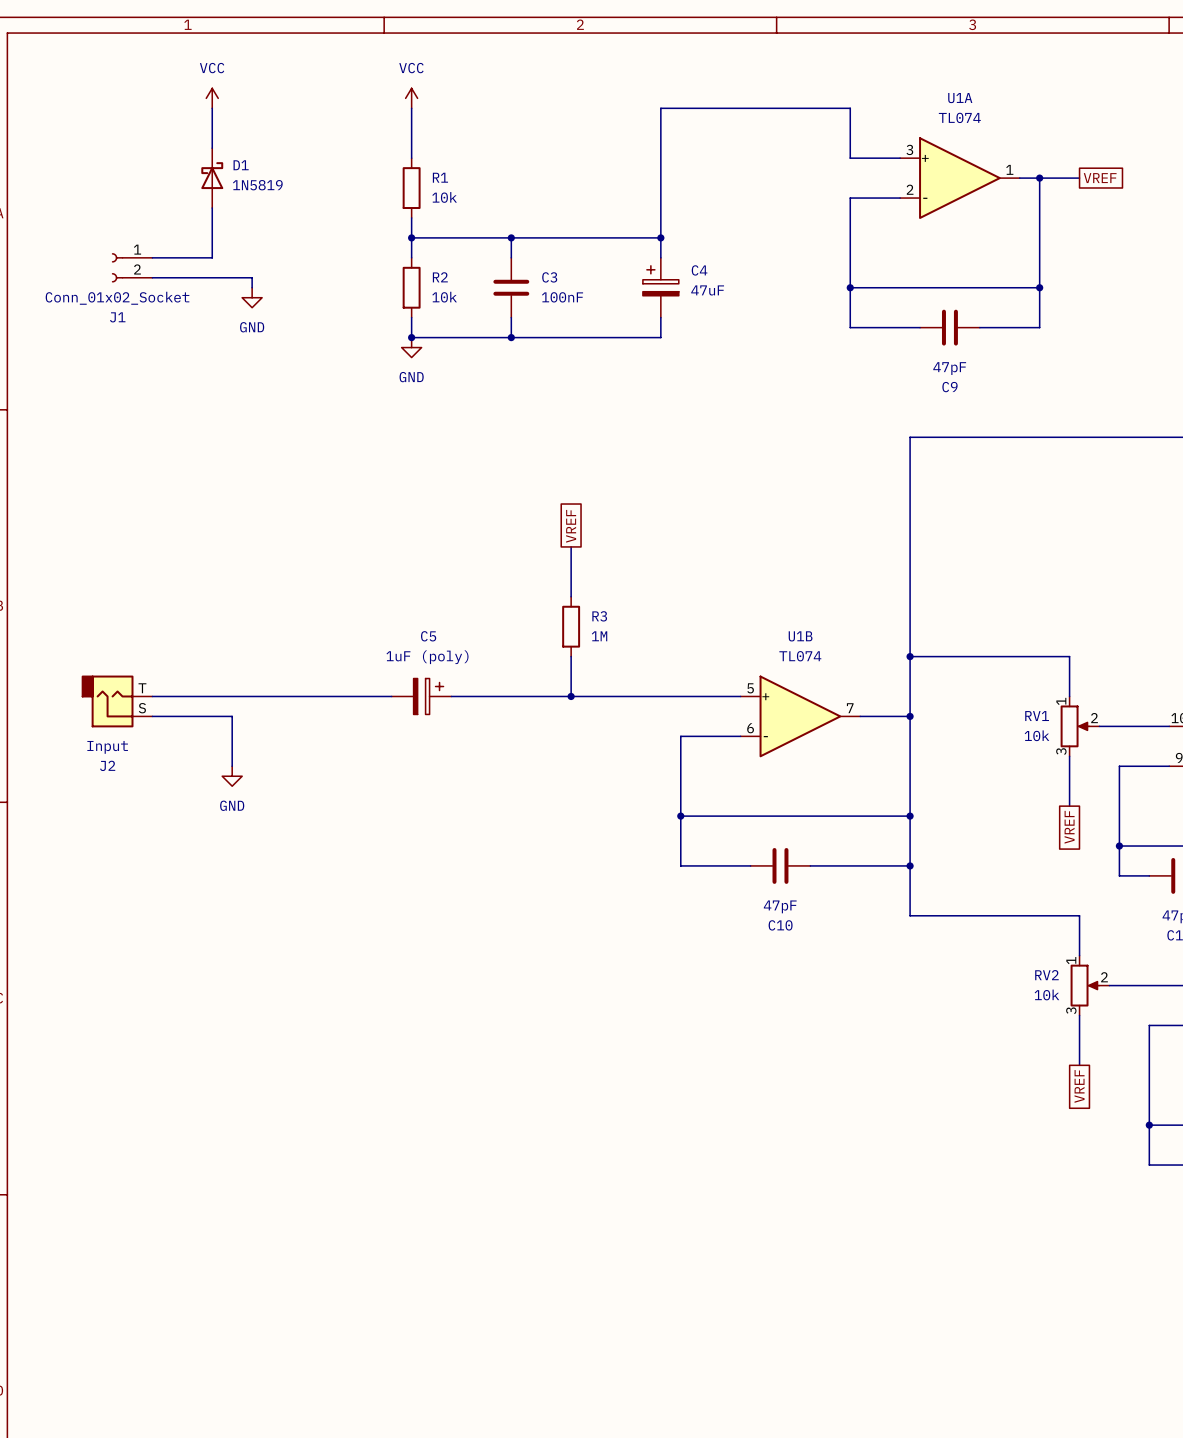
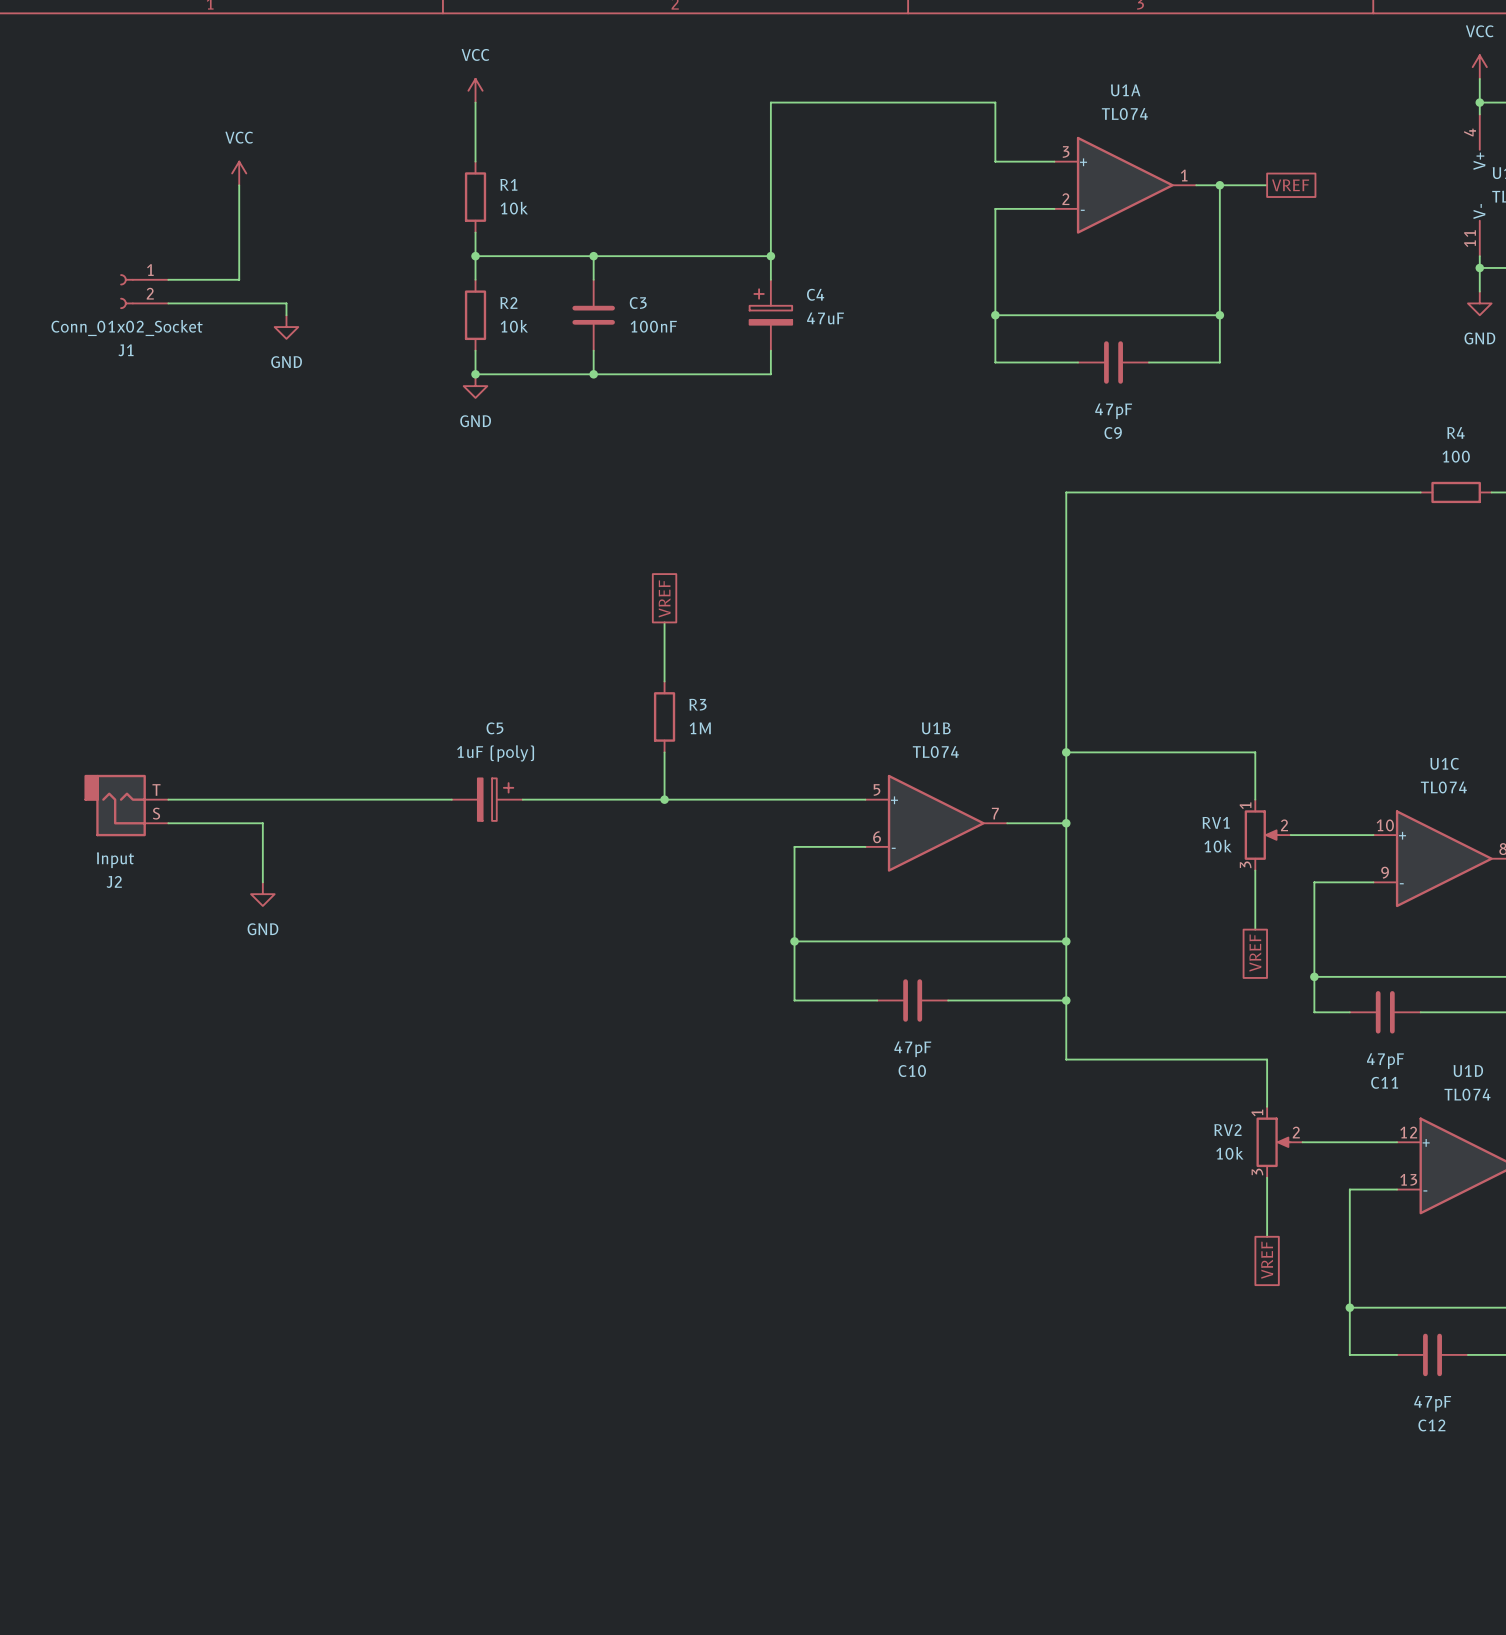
power symbol position: VCC (212, 98) -> VCC (239, 173)
wire: (212, 108) (212, 148) -> none
D1: 1N5819 (212, 178) -> none

